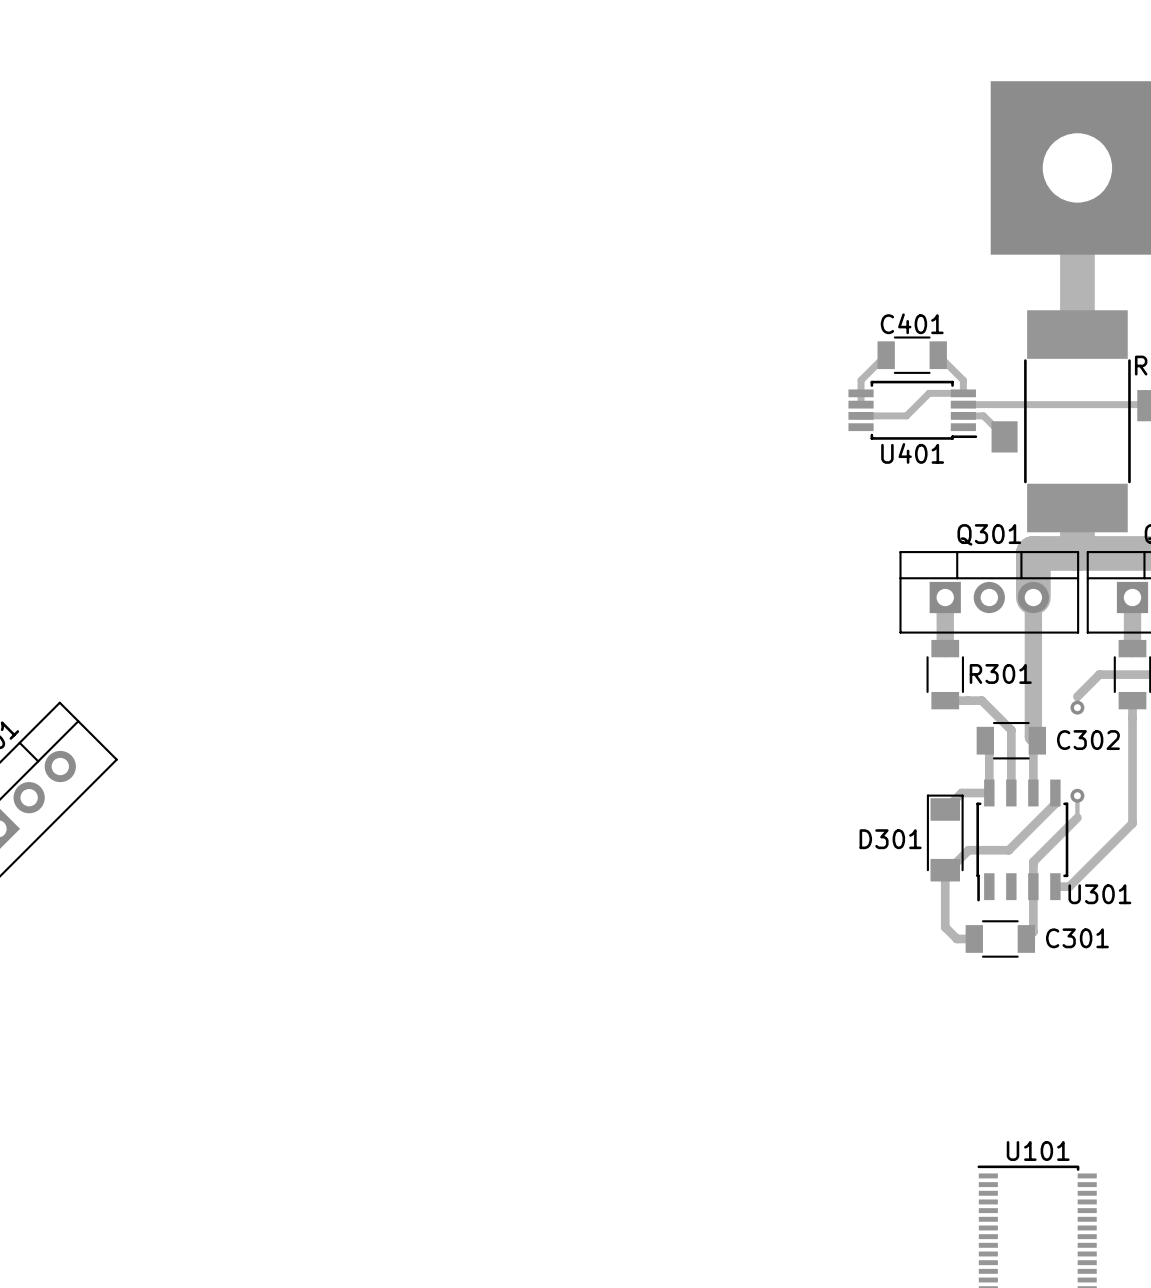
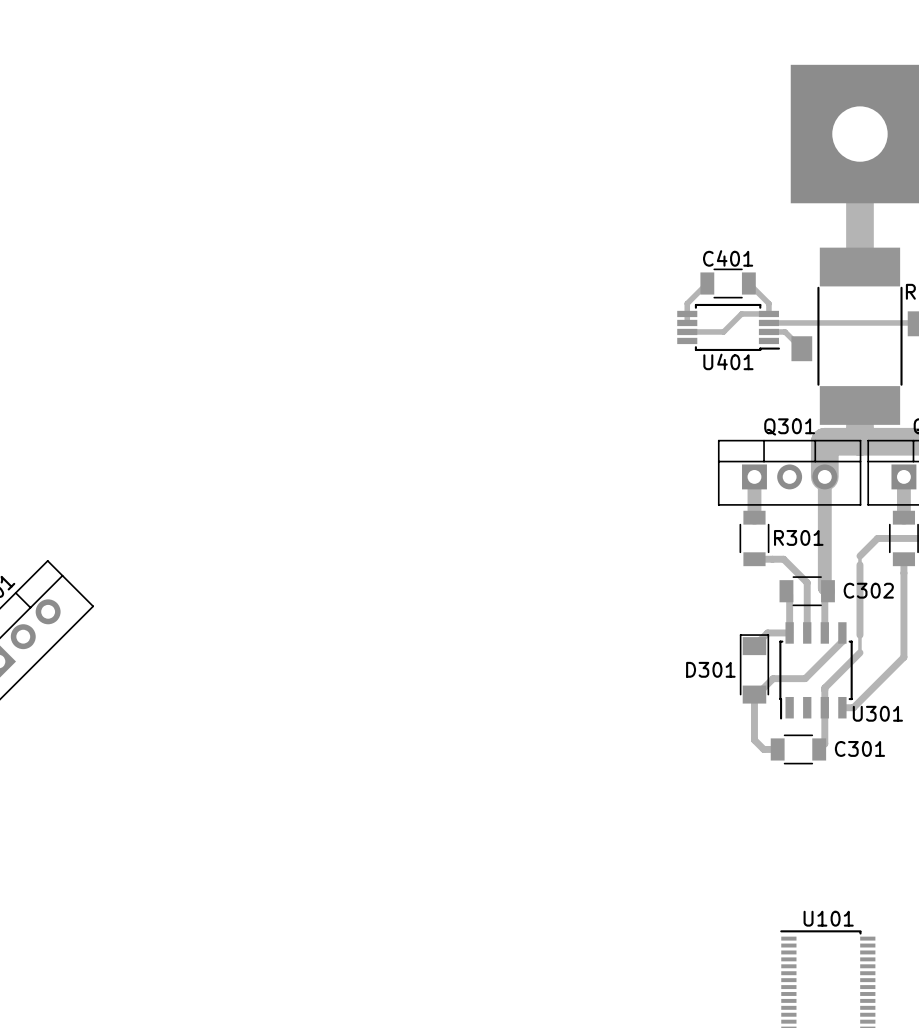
track: none -> (859, 564) (859, 635)
via: (1077, 707) -> none
via: (1077, 795) -> none

